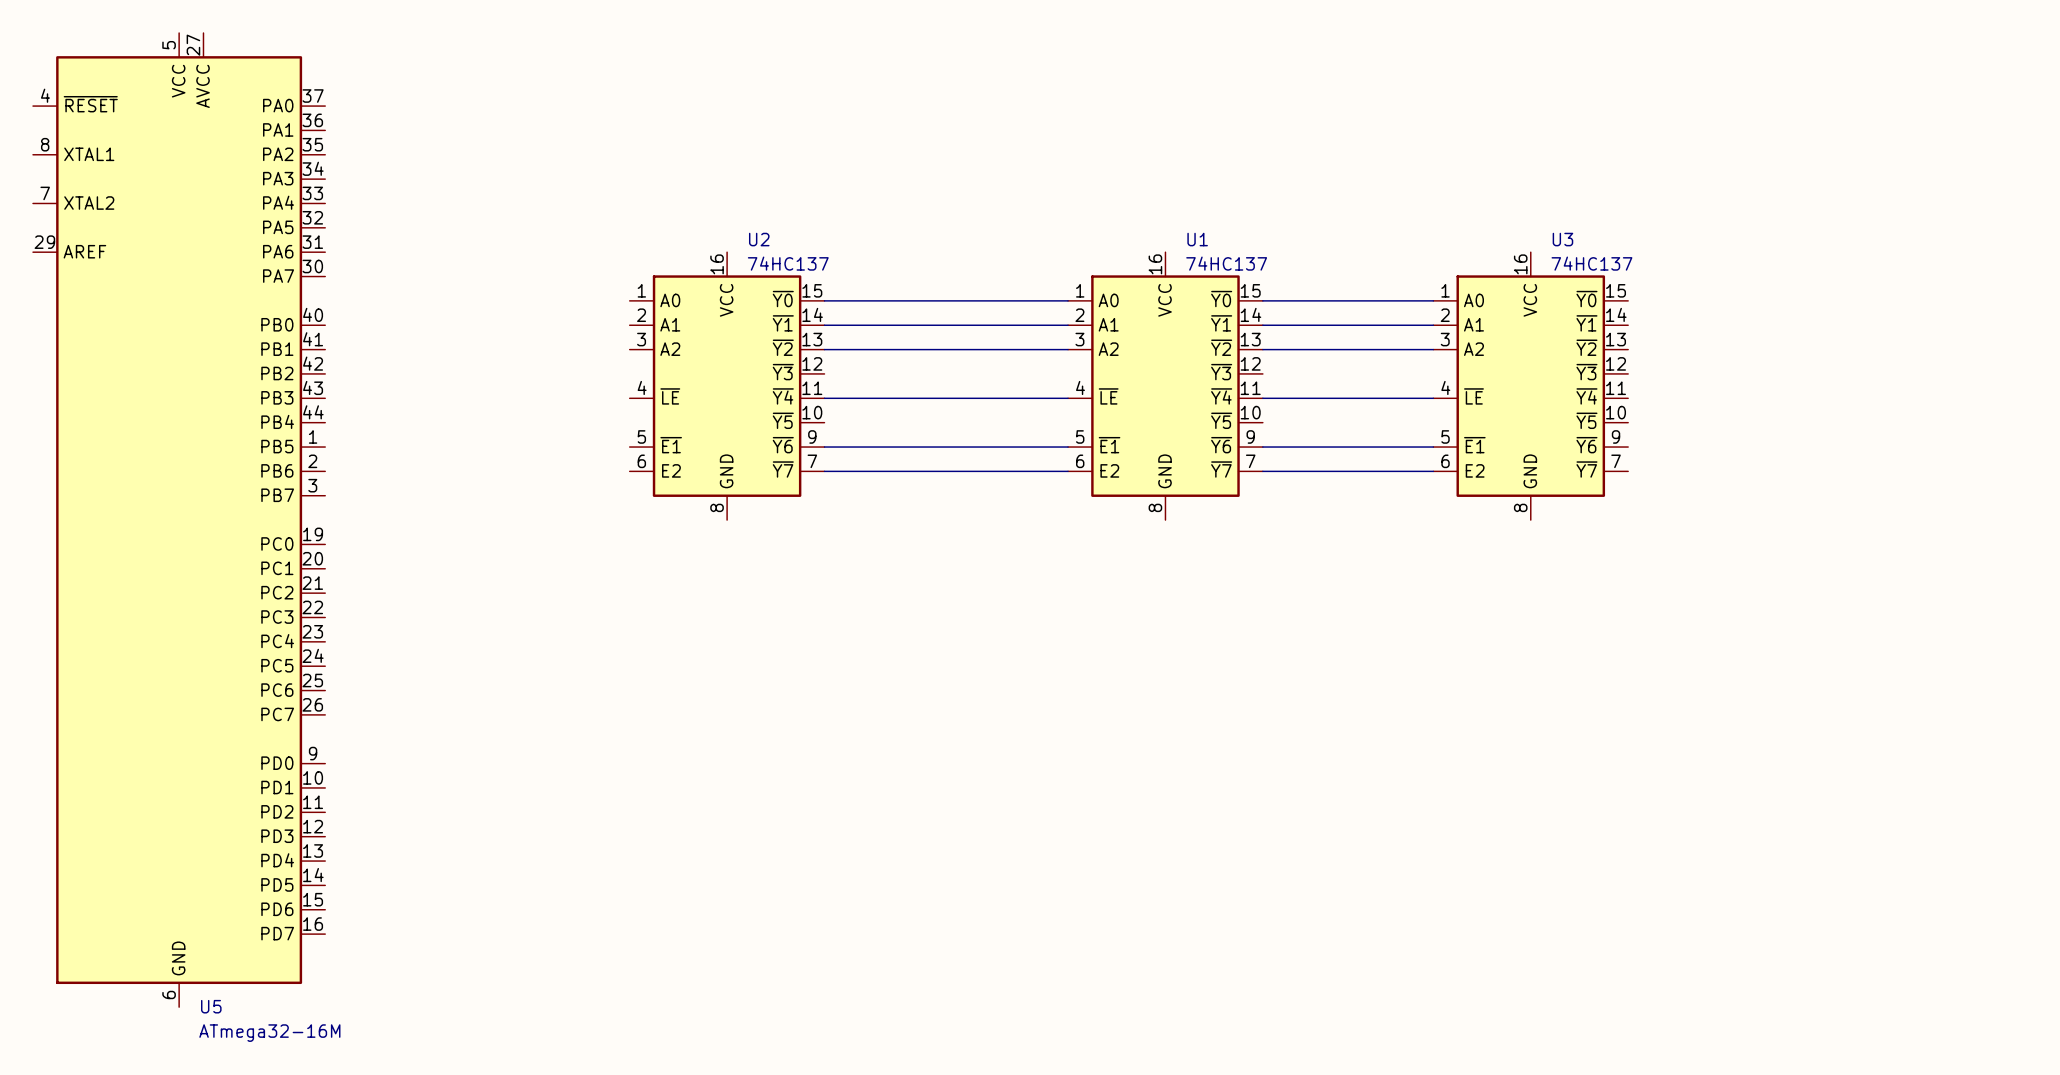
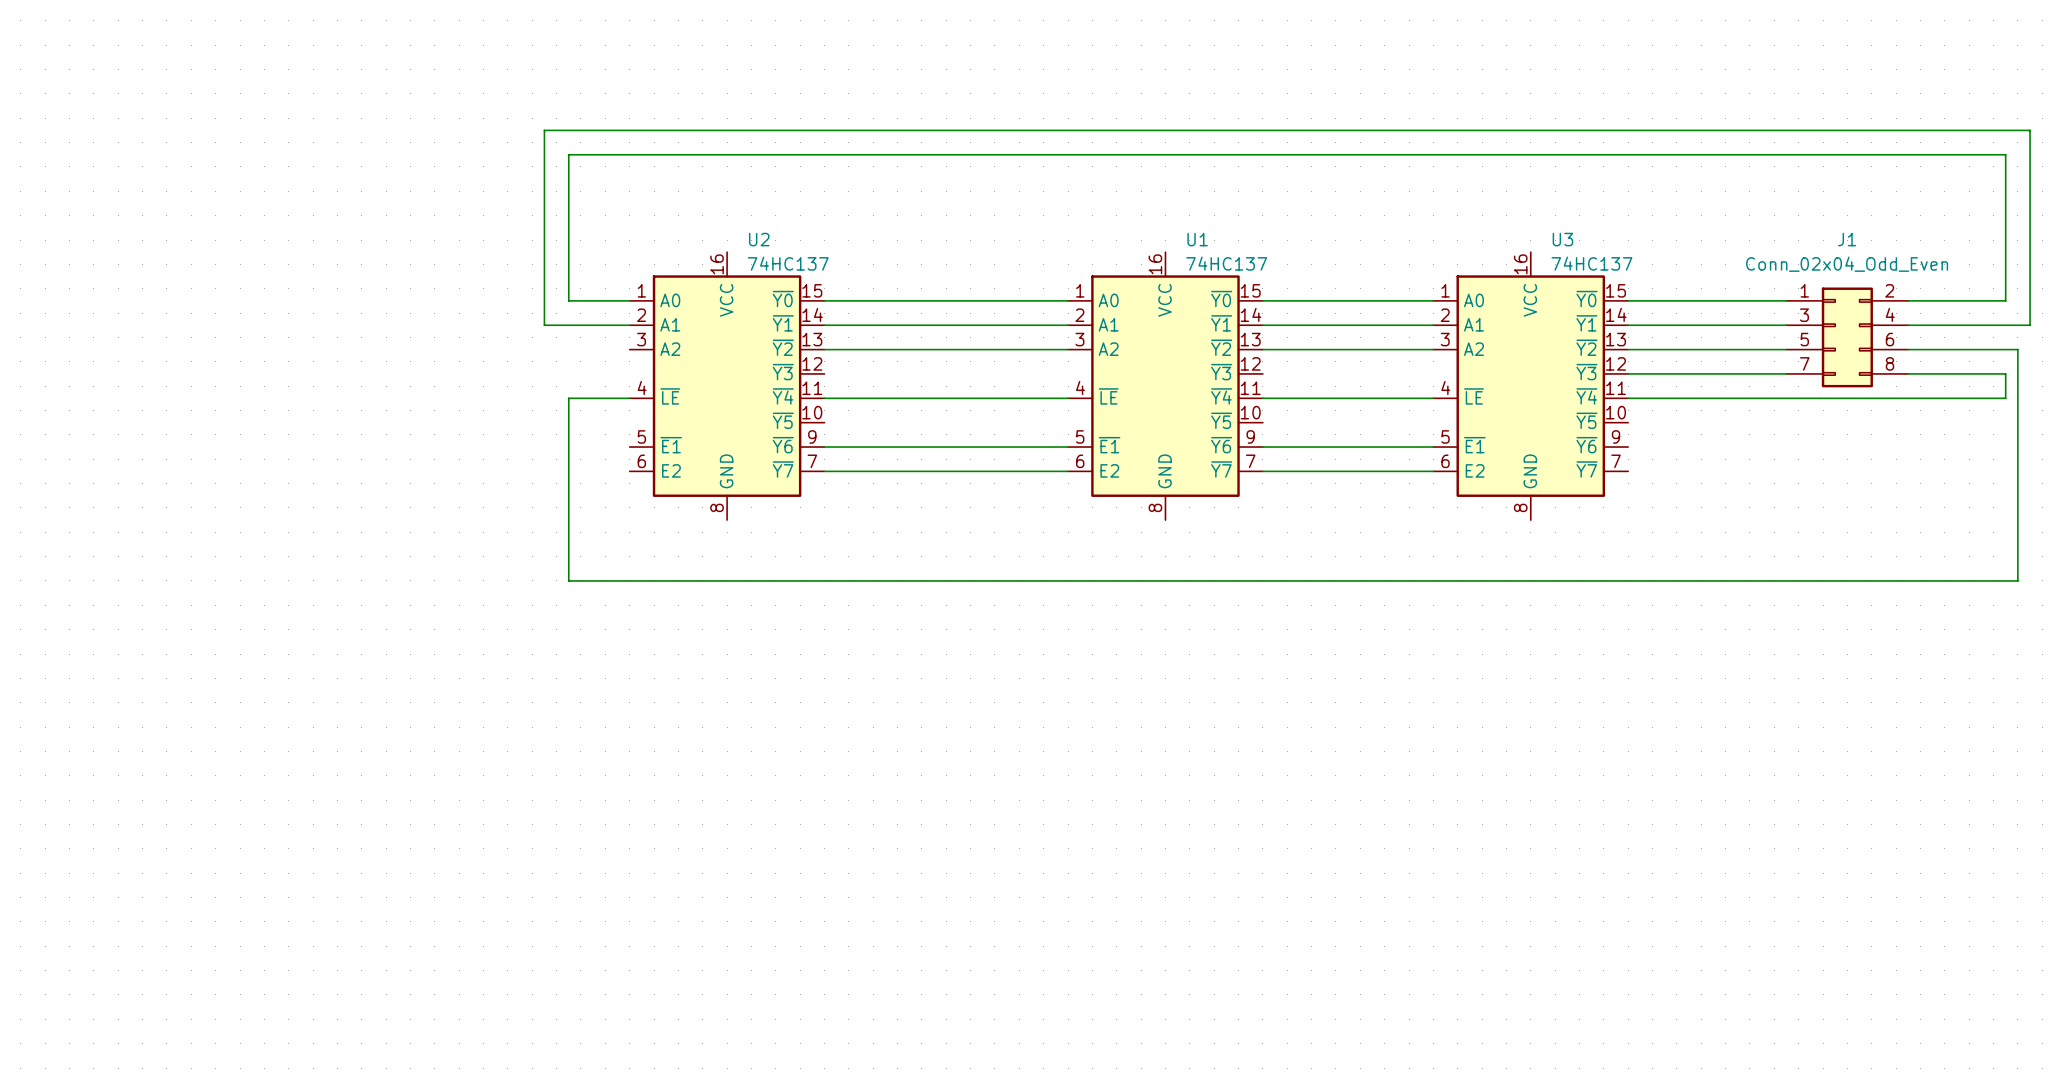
wire: none -> (629, 300) (568, 300) (568, 154) (2005, 154) (2005, 300) (1908, 300)
wire: none -> (1628, 300) (1786, 300)
wire: none -> (629, 325) (544, 325) (544, 130) (2030, 130) (2030, 325) (1908, 325)
wire: none -> (1628, 325) (1786, 325)
J1: none -> Conn_02x04_Odd_Even (1847, 337)
wire: none -> (1628, 349) (1786, 349)
wire: none -> (1908, 349) (2017, 349) (2017, 580) (568, 580) (568, 398) (629, 398)
wire: none -> (1628, 373) (1786, 373)
wire: none -> (1908, 373) (2005, 373) (2005, 398) (1628, 398)
U5: ATmega32-16M (179, 520) -> none

